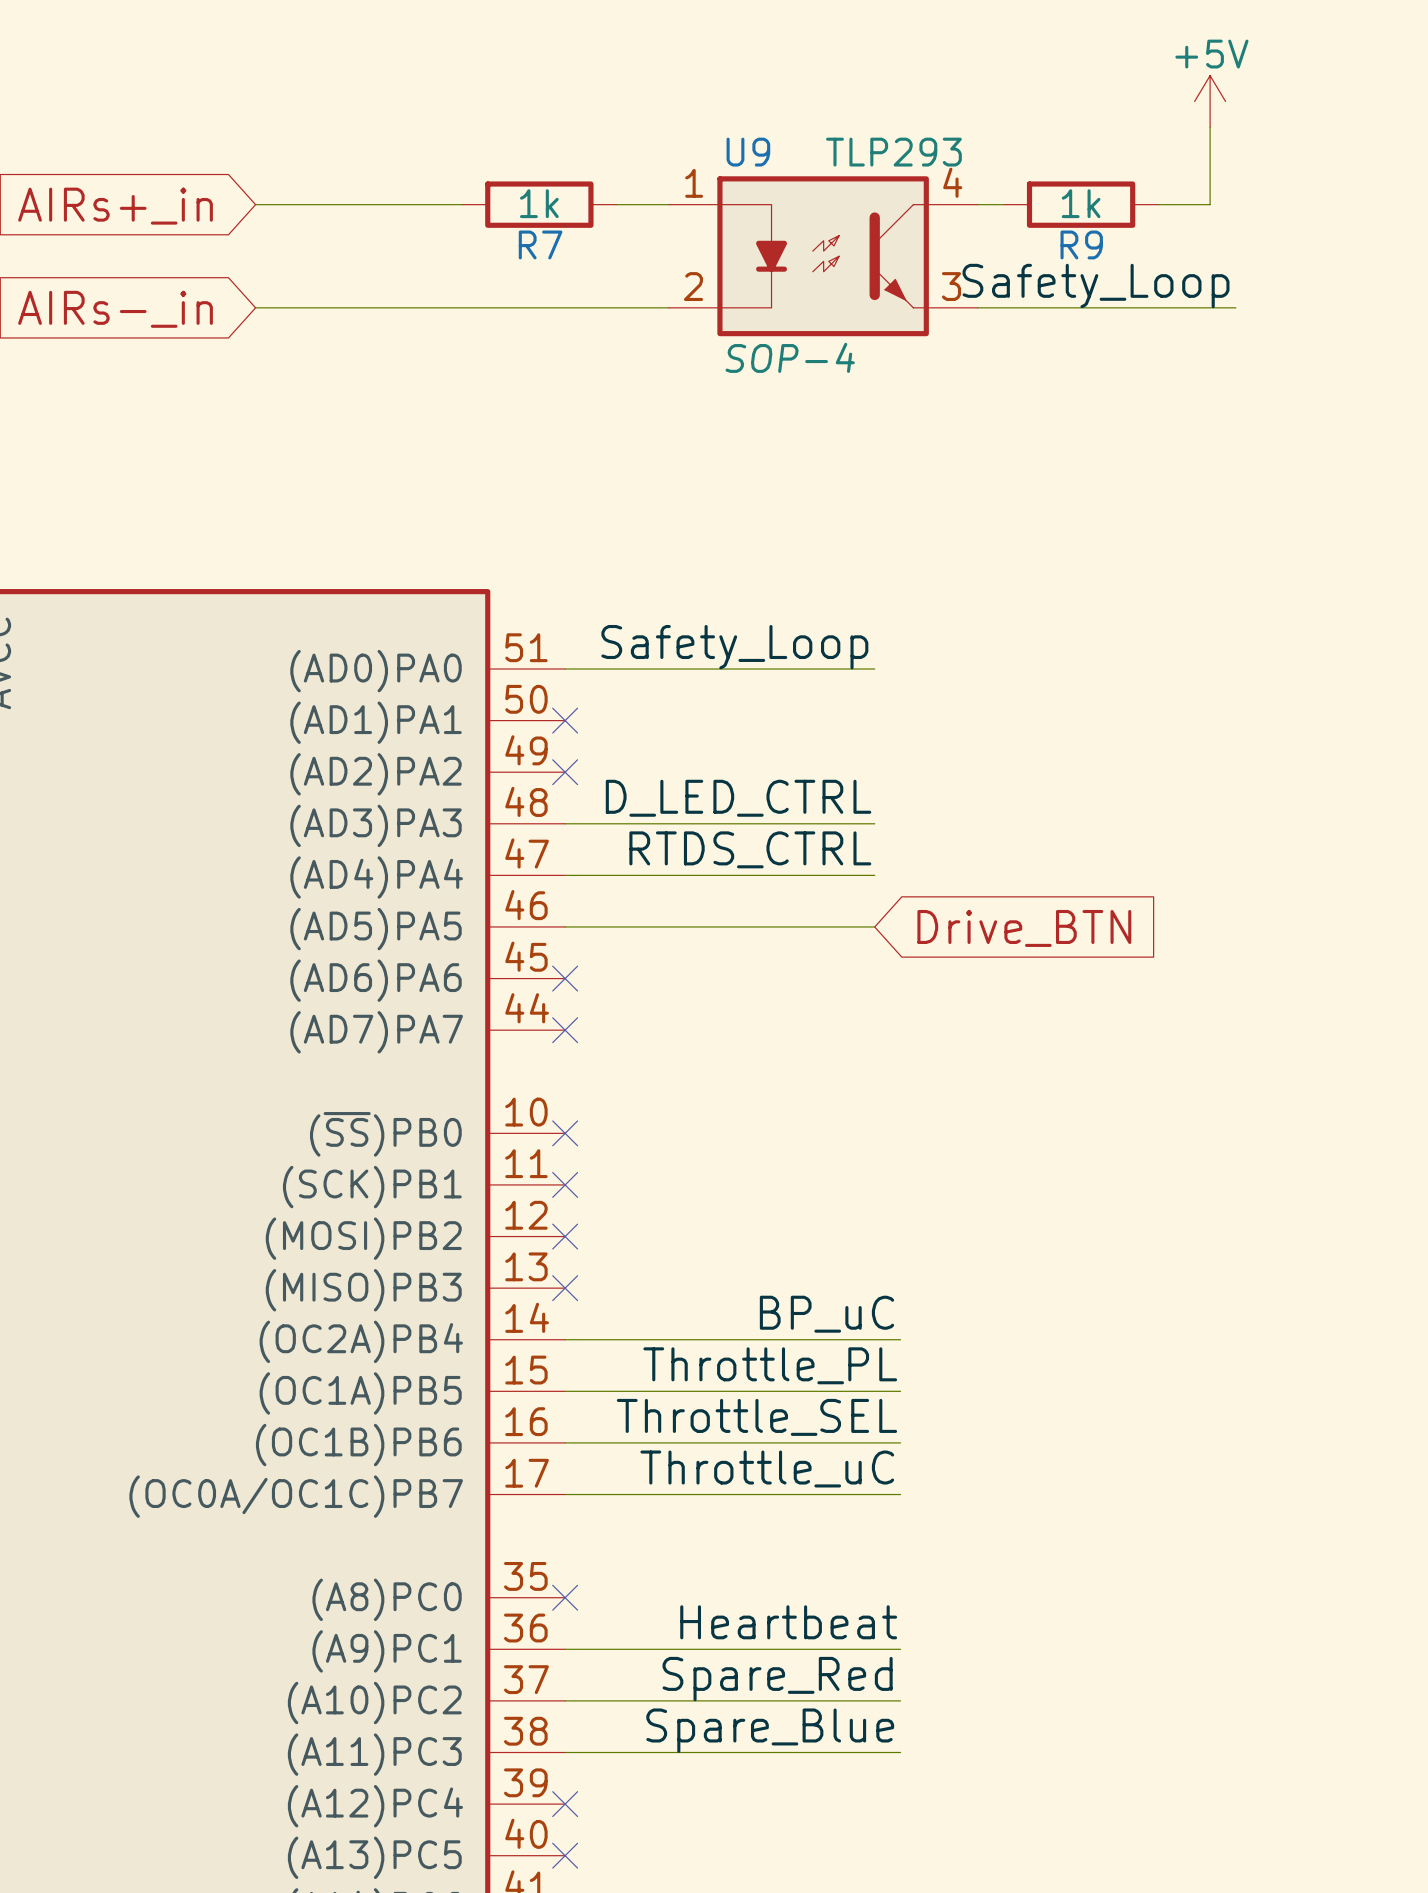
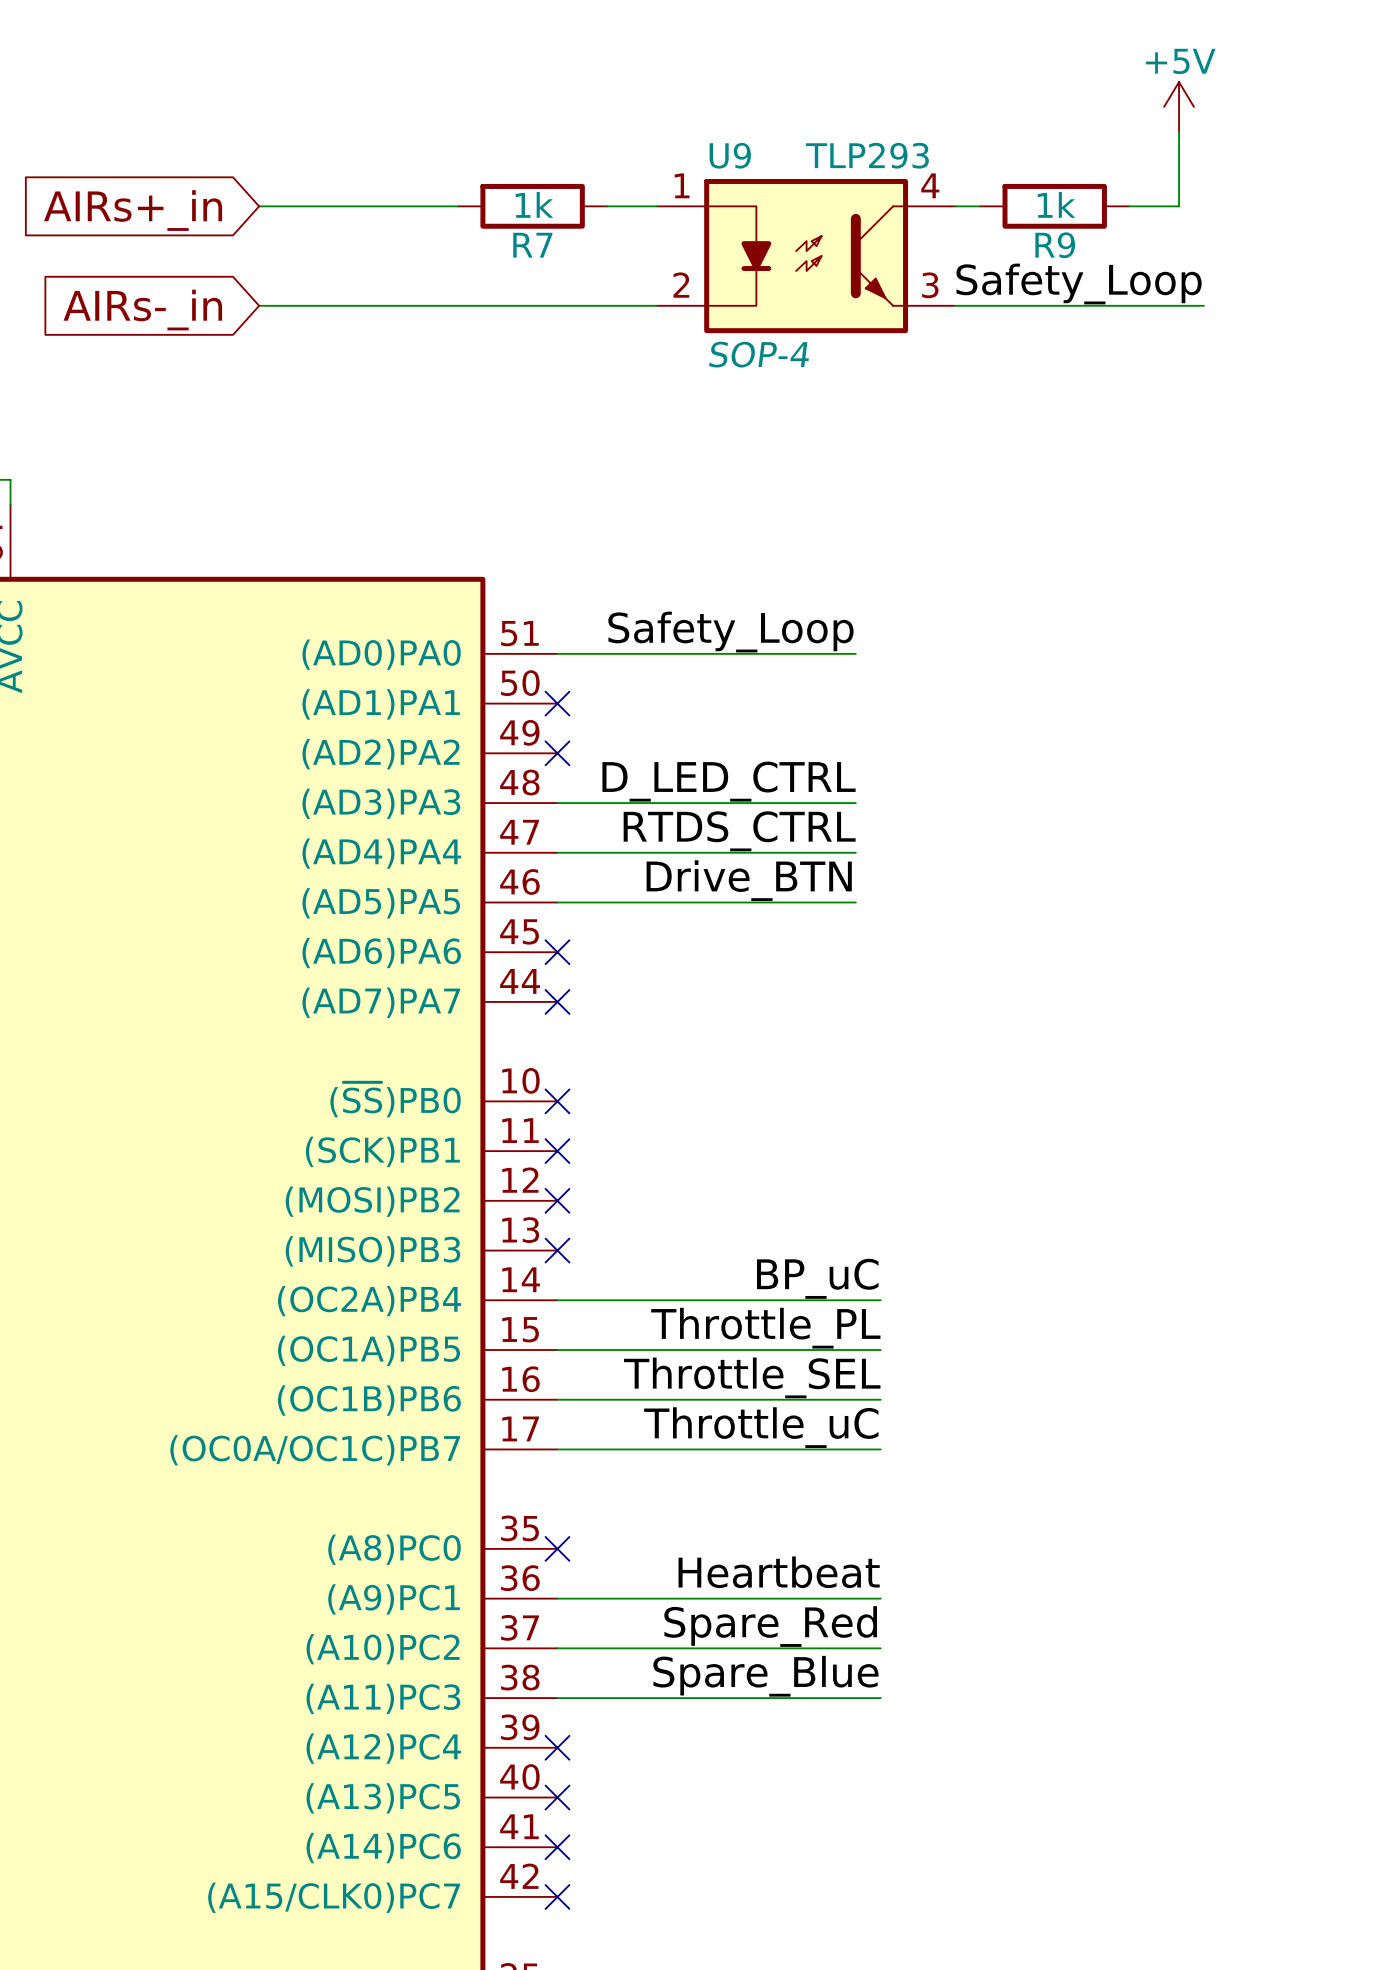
label: none -> Drive_BTN (749, 880)
global label: Drive_BTN (1024, 928) -> none

